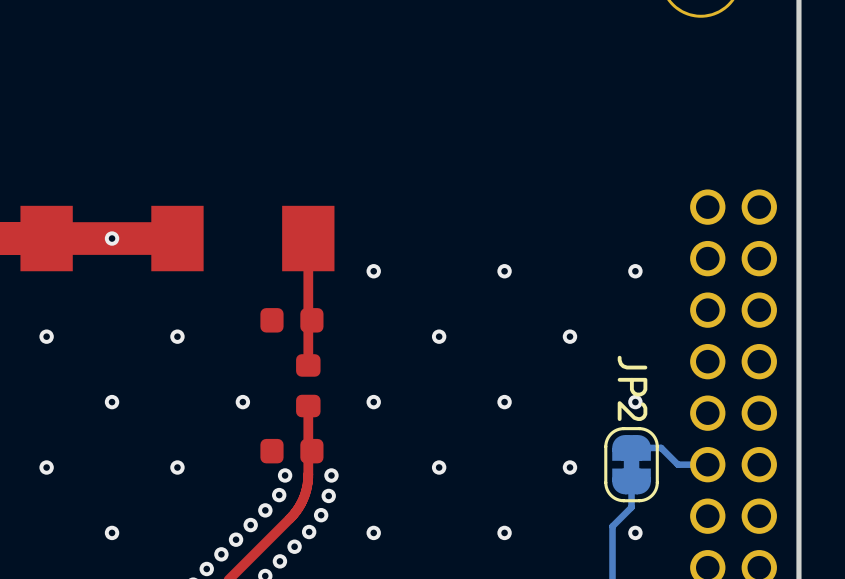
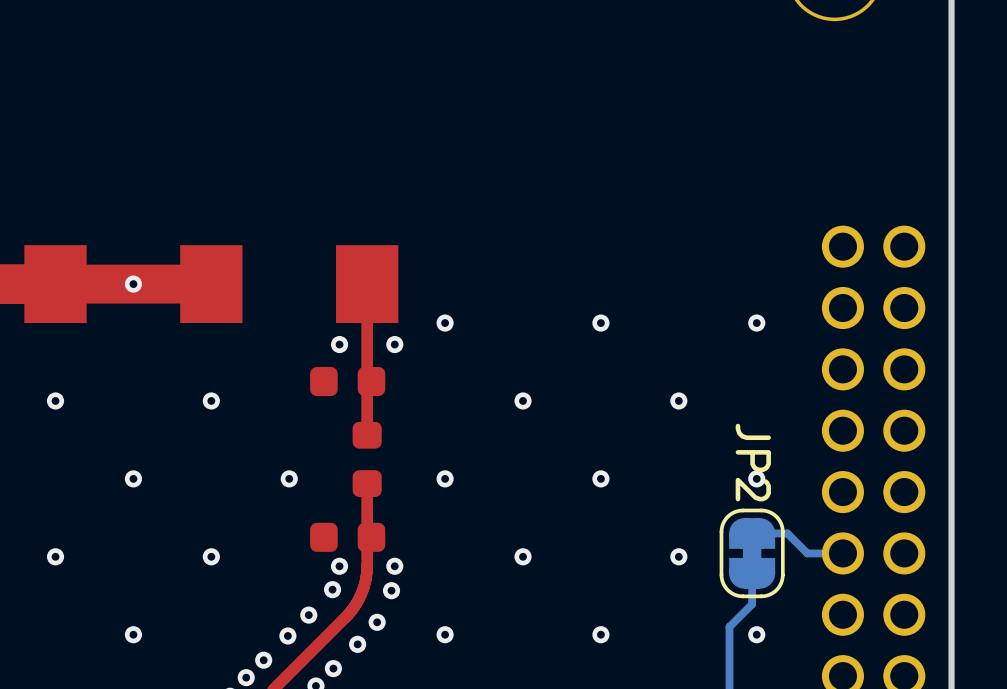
via: none -> (339, 344)
via: none -> (394, 344)
via: (265, 510) -> none
via: (321, 515) -> none
via: none -> (308, 615)
via: none -> (377, 622)
via: (250, 525) -> none
via: (309, 532) -> none
via: none -> (287, 635)
via: (236, 539) -> none
via: none -> (357, 644)
via: (294, 546) -> none

